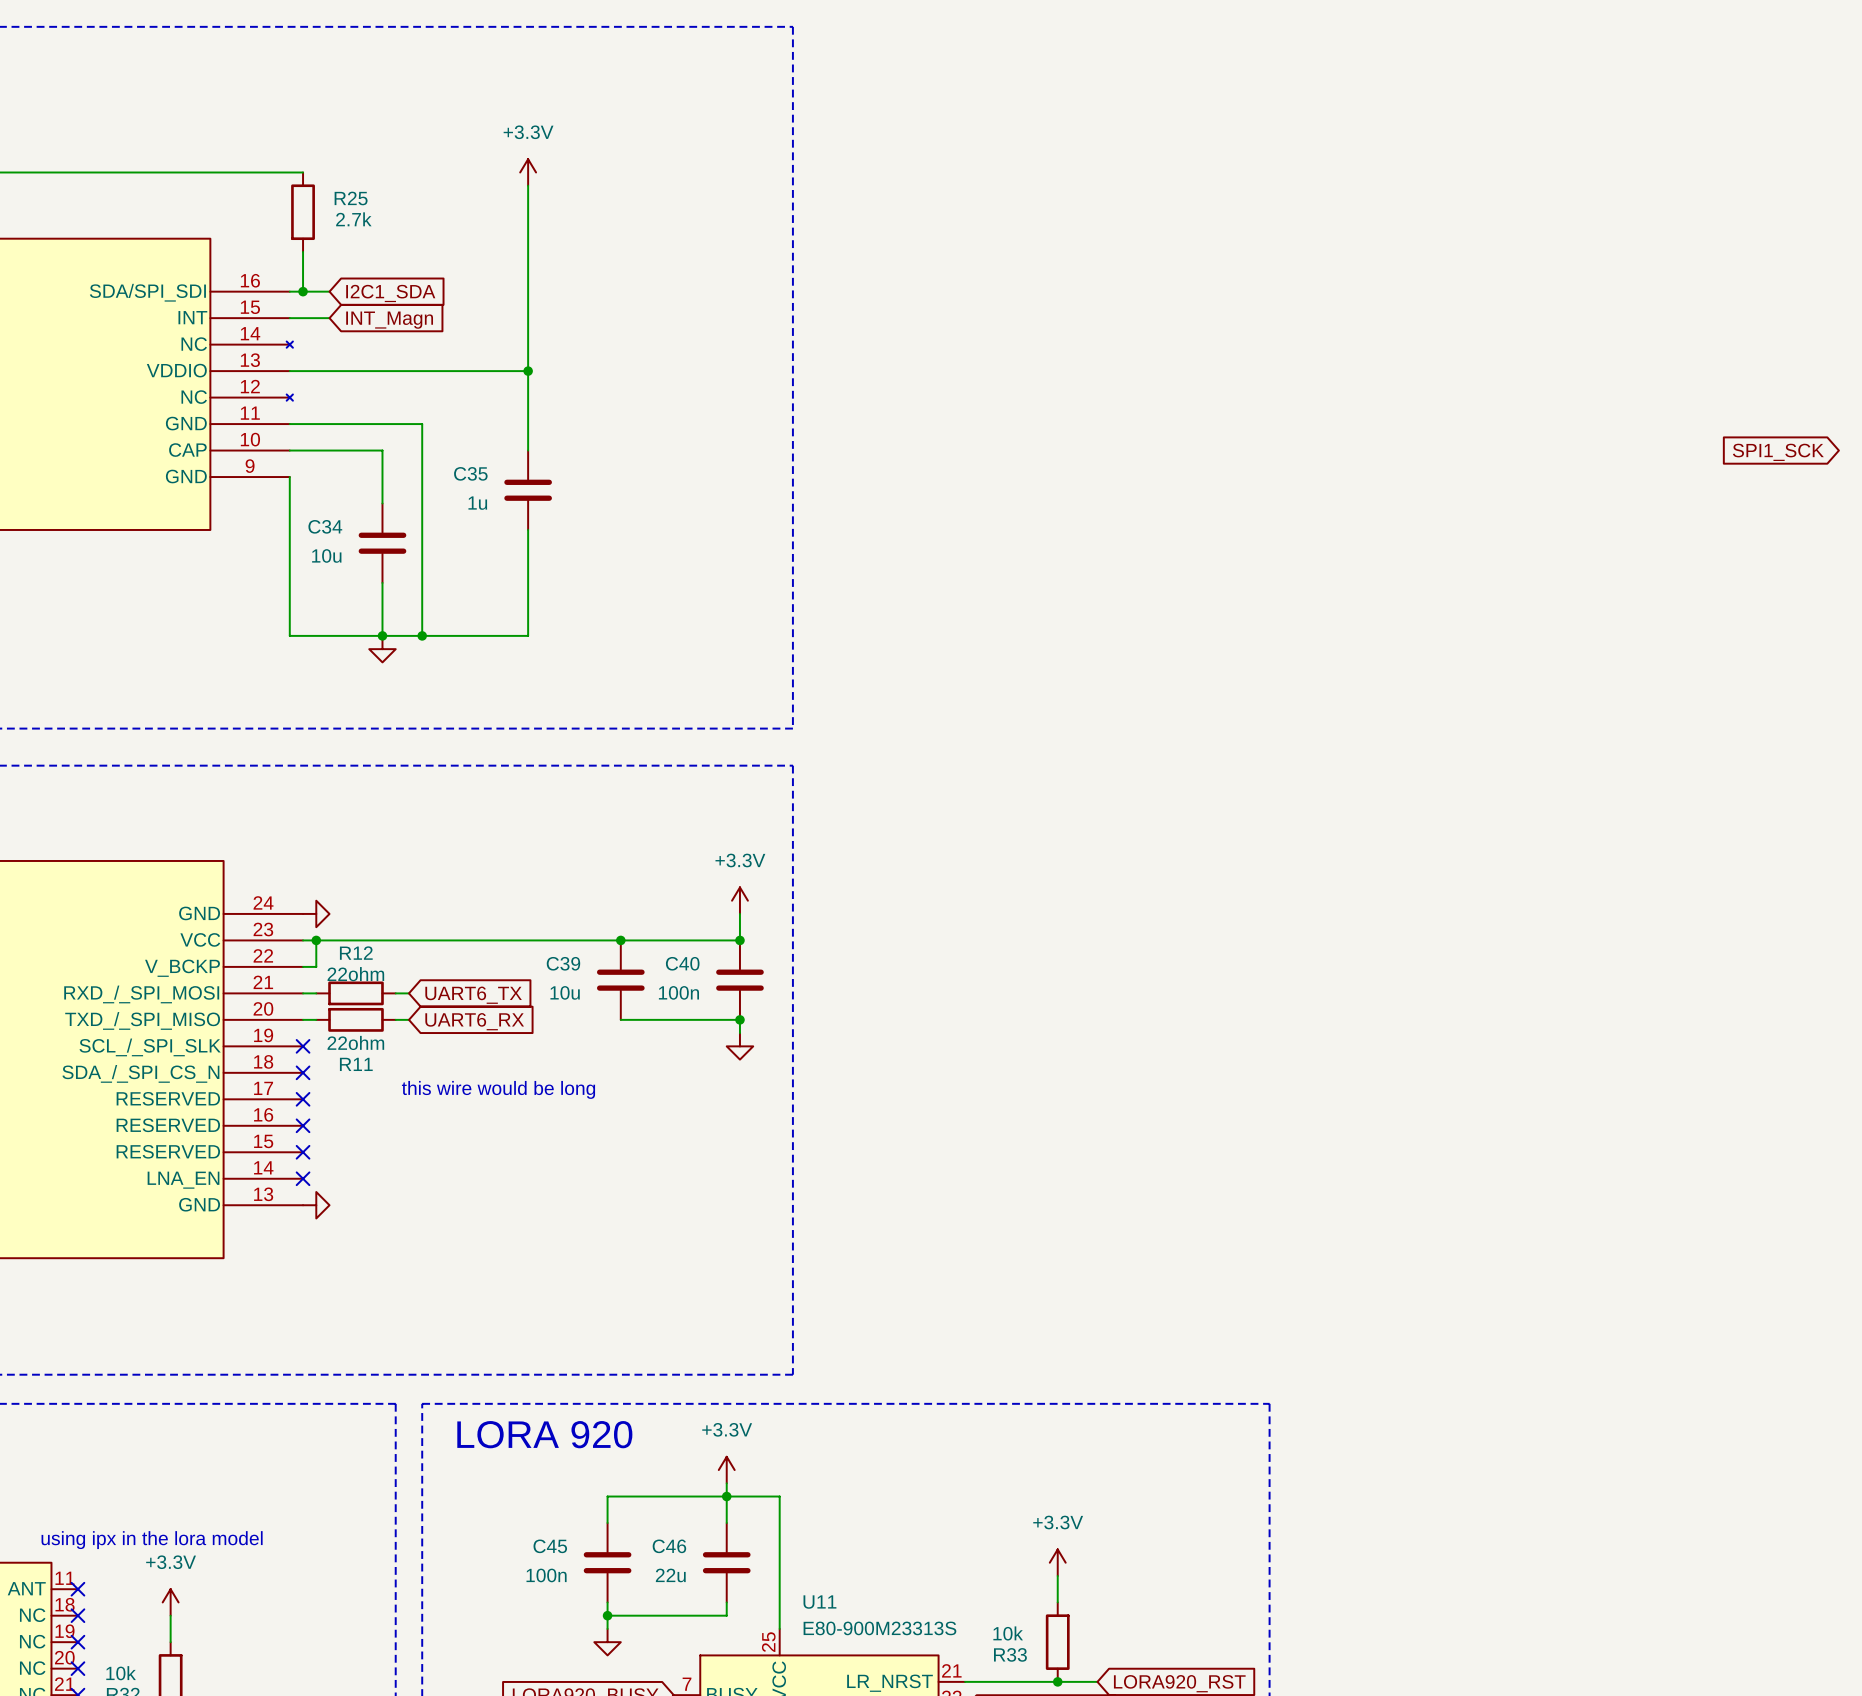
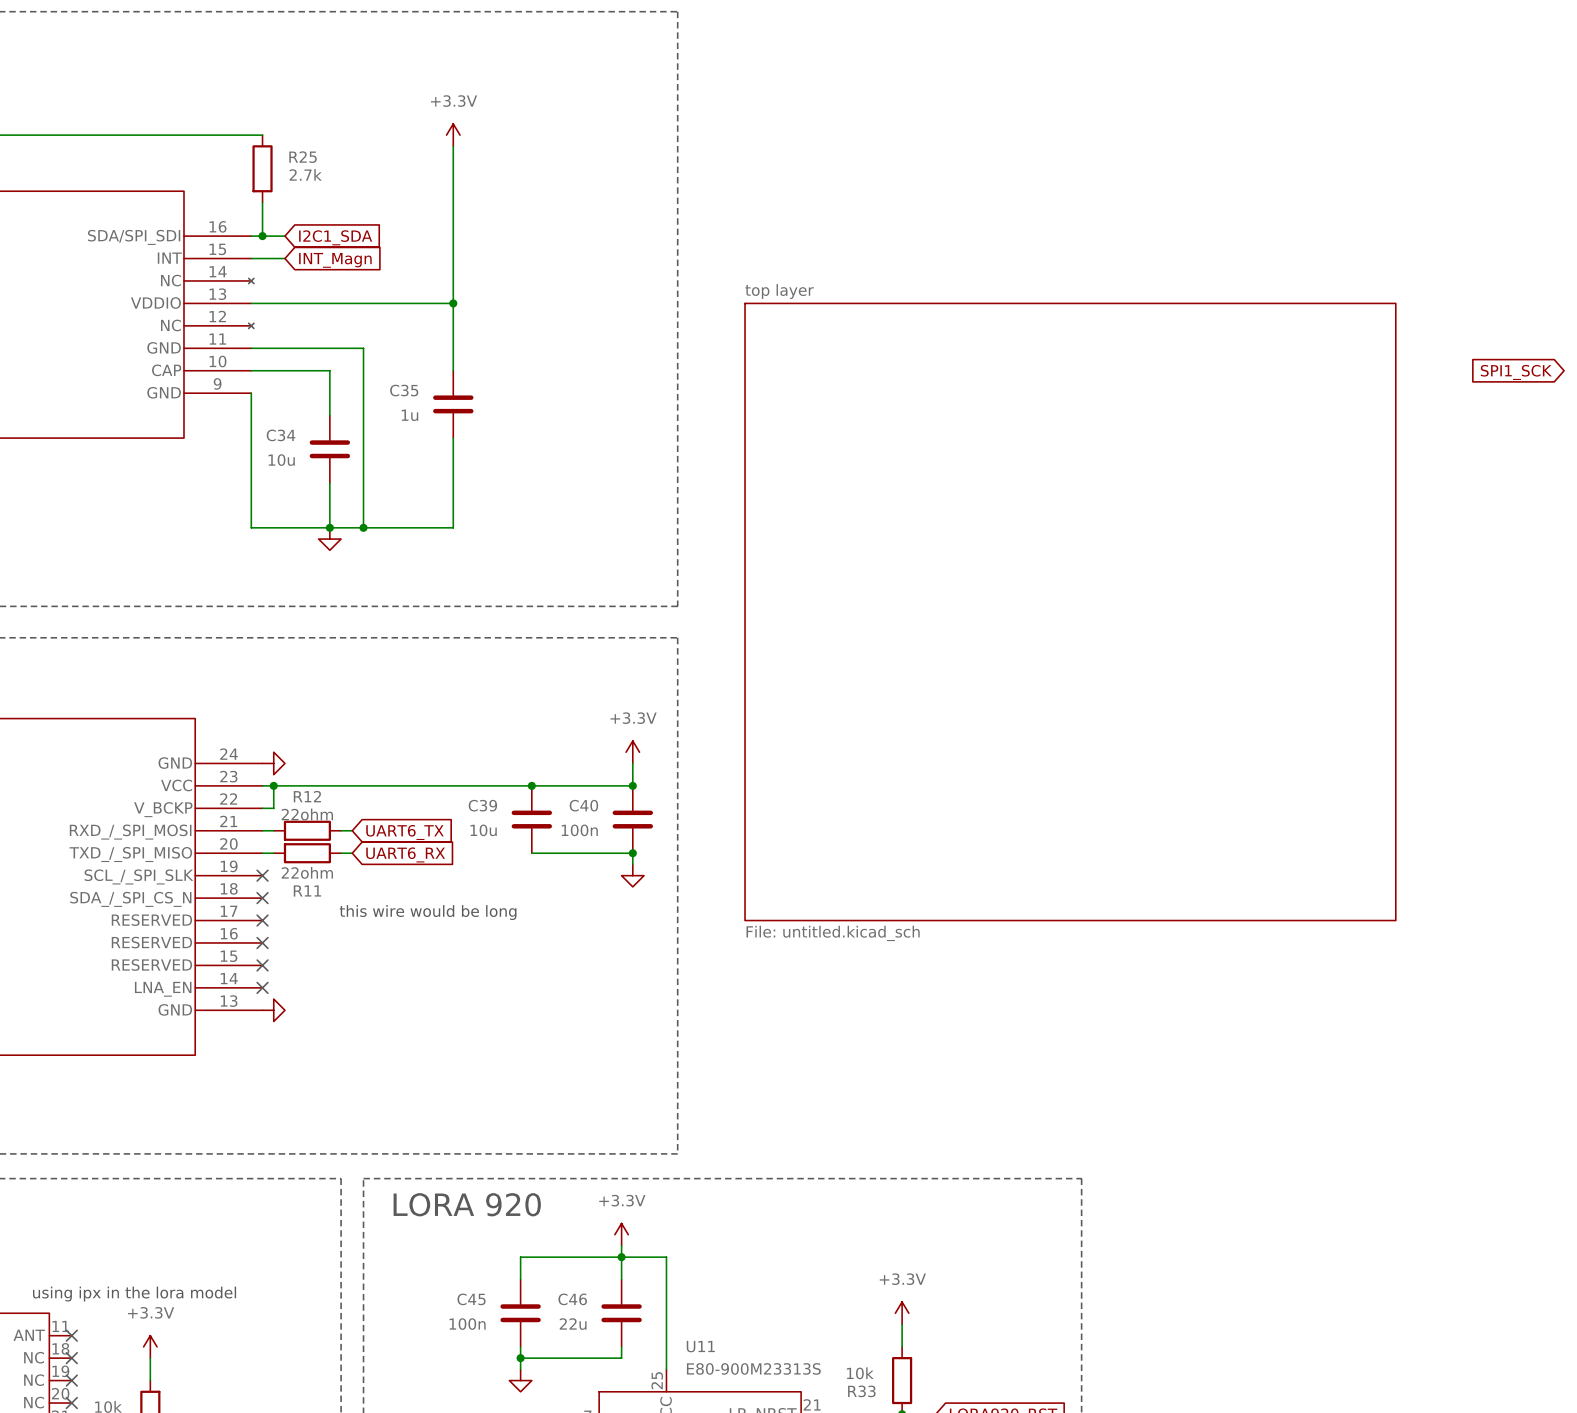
sheet top layer: none -> File: untitled.kicad_sch (1070, 611)

